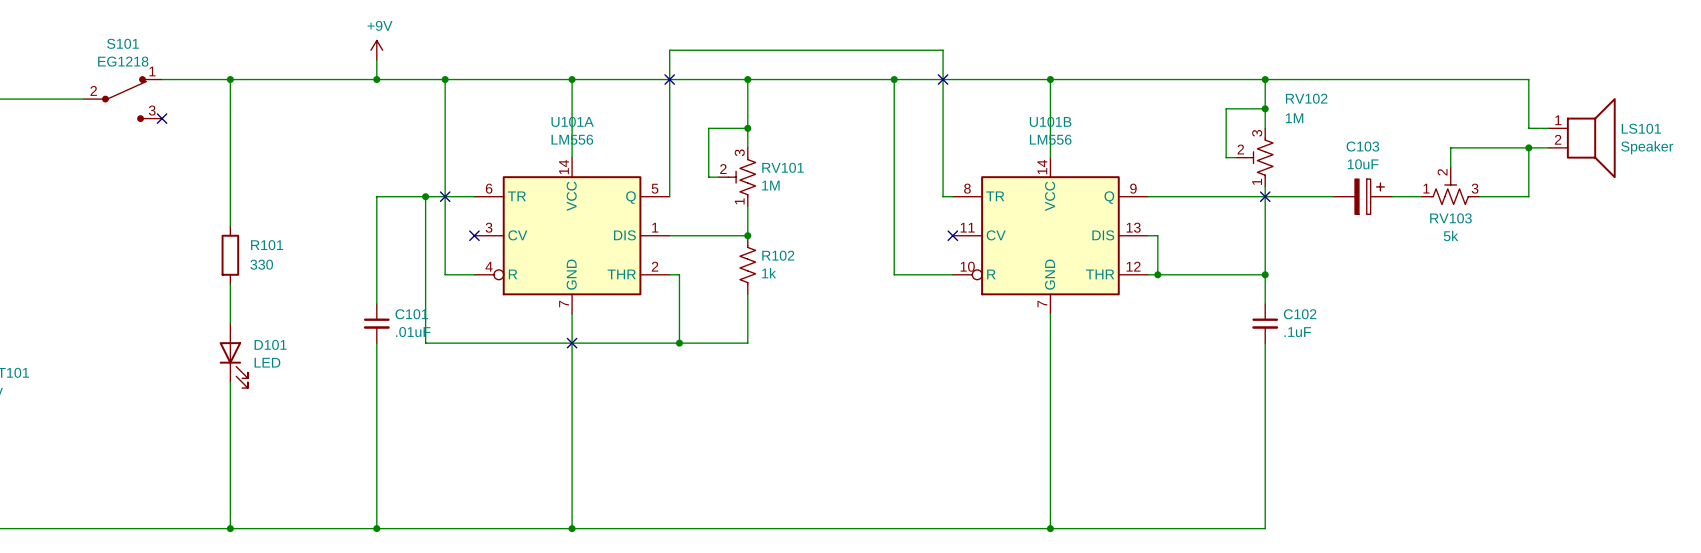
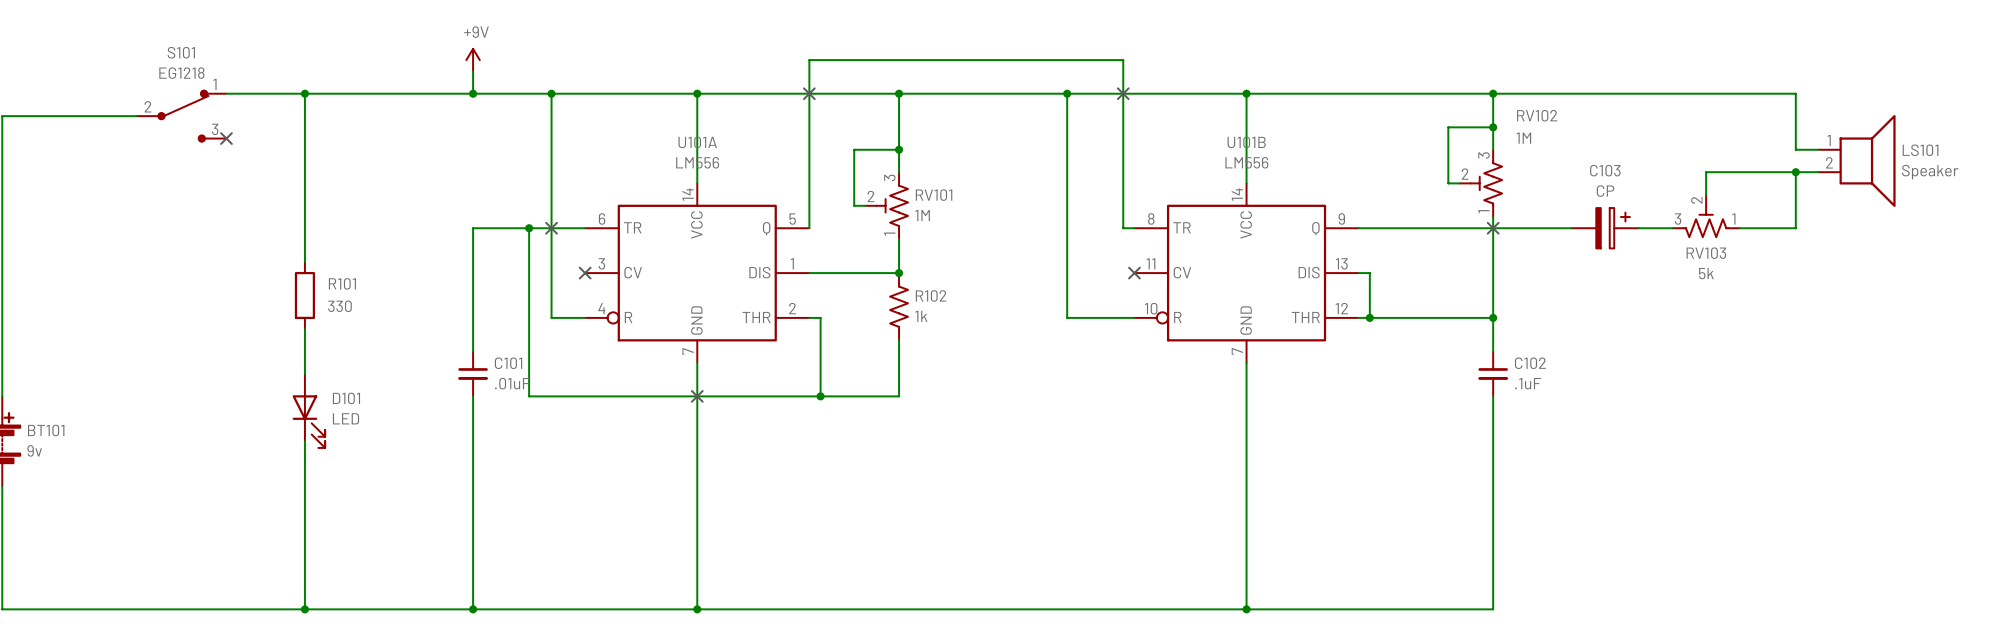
C103 value: 10uF (1363, 164) -> CP (1605, 191)
RV103 flip: as is (1450, 190) -> left-right (1706, 221)

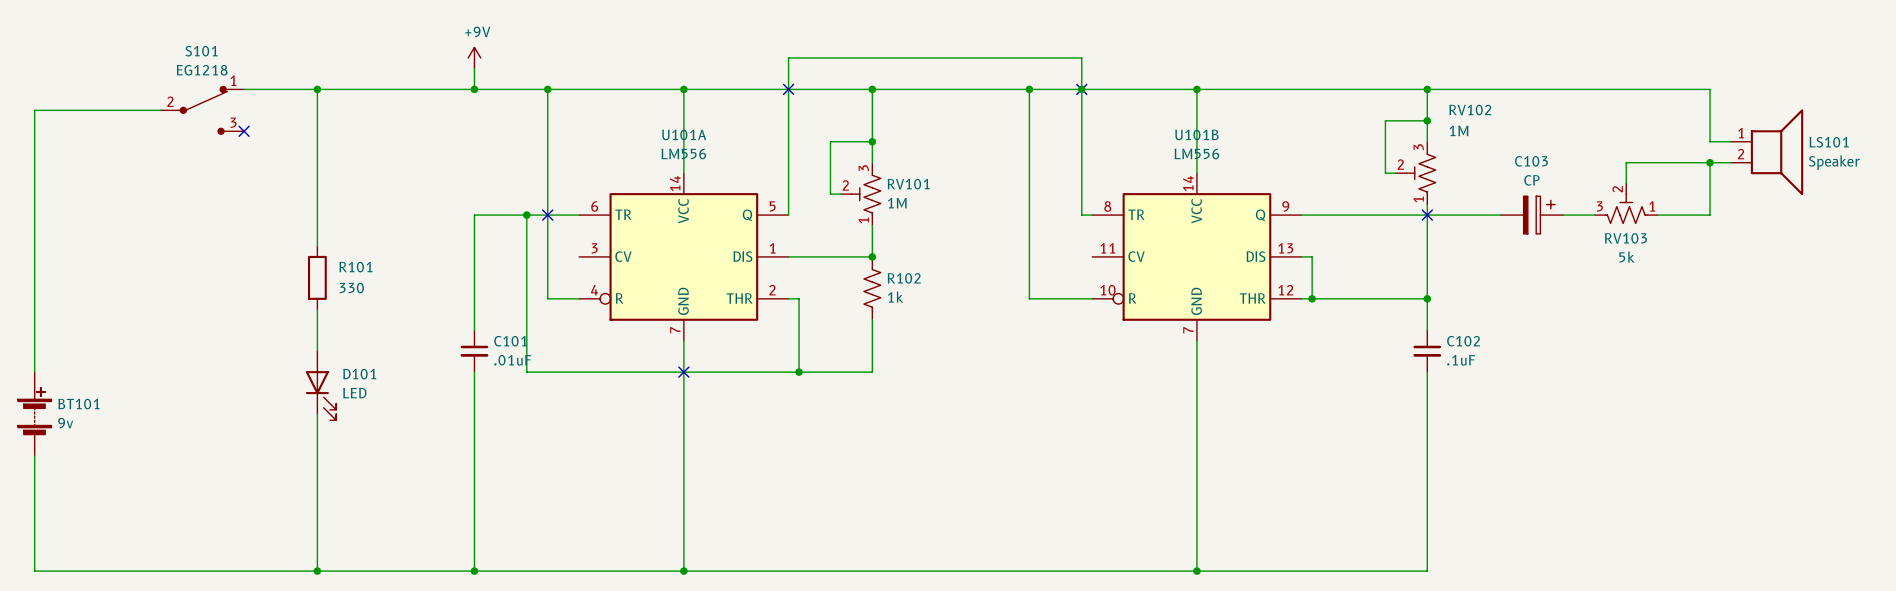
junction: none -> (1081, 89)
no-connect mark: (585, 273) -> none
no-connect mark: (1134, 273) -> none

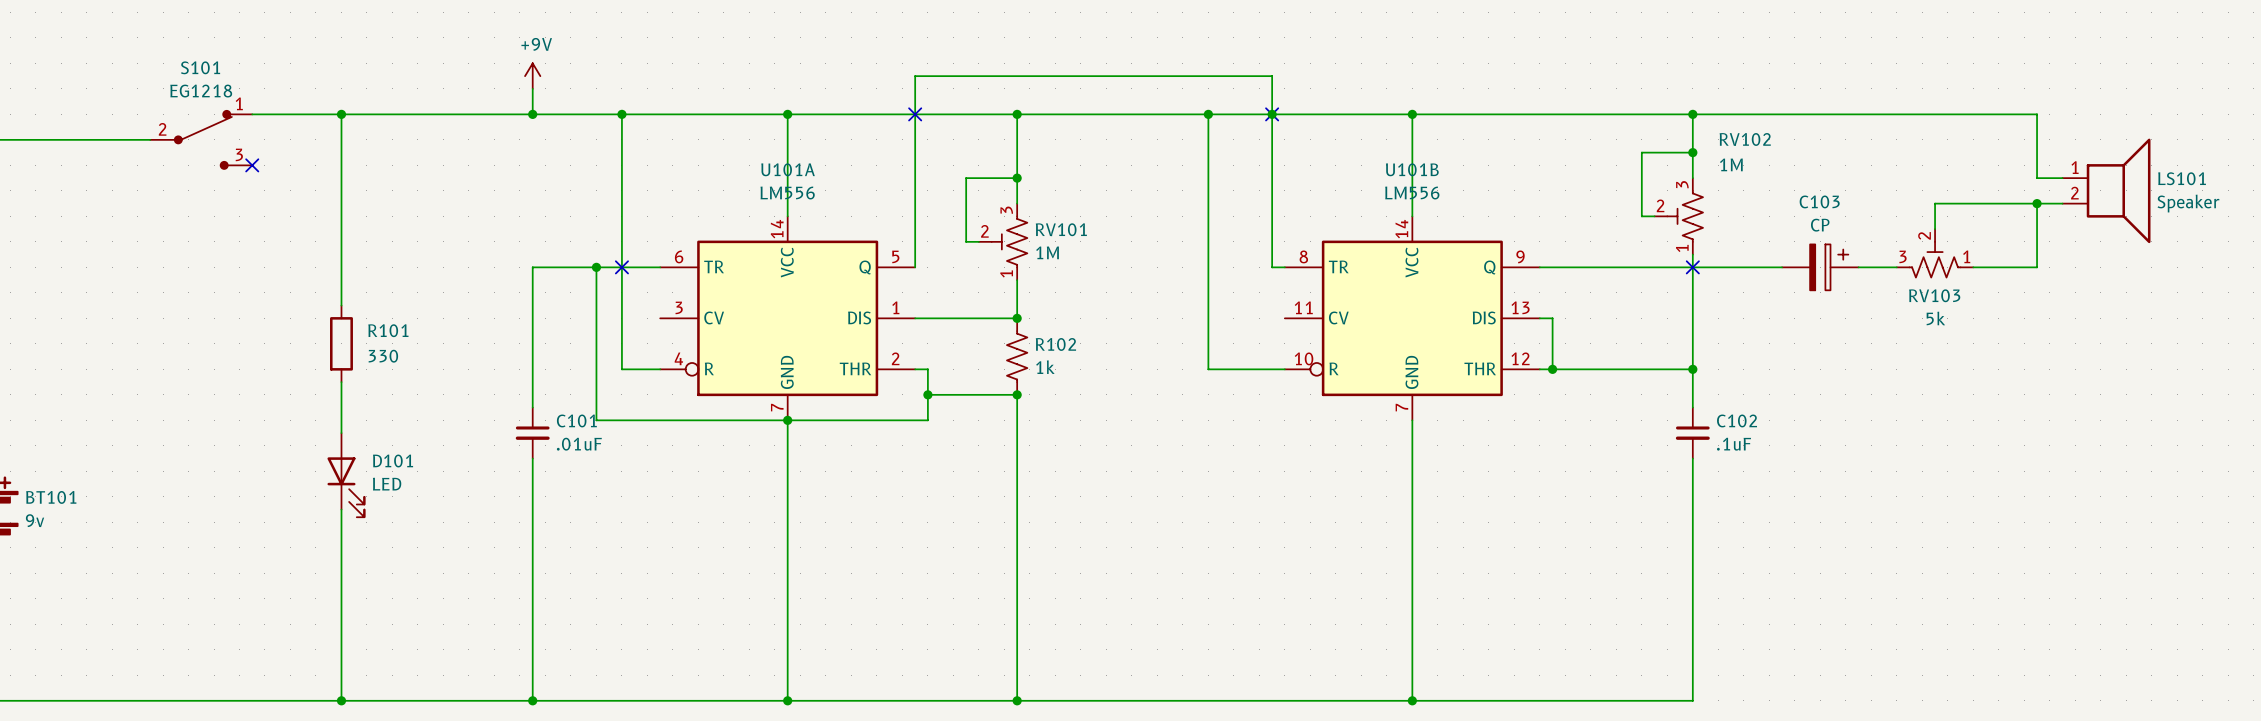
wire: none -> (927, 394) (1017, 394)
junction: none -> (927, 394)
junction: none -> (1017, 394)
wire: (526, 340) (526, 372) (872, 372) -> (596, 420) (927, 420)
junction: none -> (787, 420)
wire: (799, 340) (799, 372) -> none
no-connect mark: (683, 372) -> none
junction: (799, 372) -> none
wire: none -> (1017, 458) (1017, 700)
junction: none -> (1017, 700)

